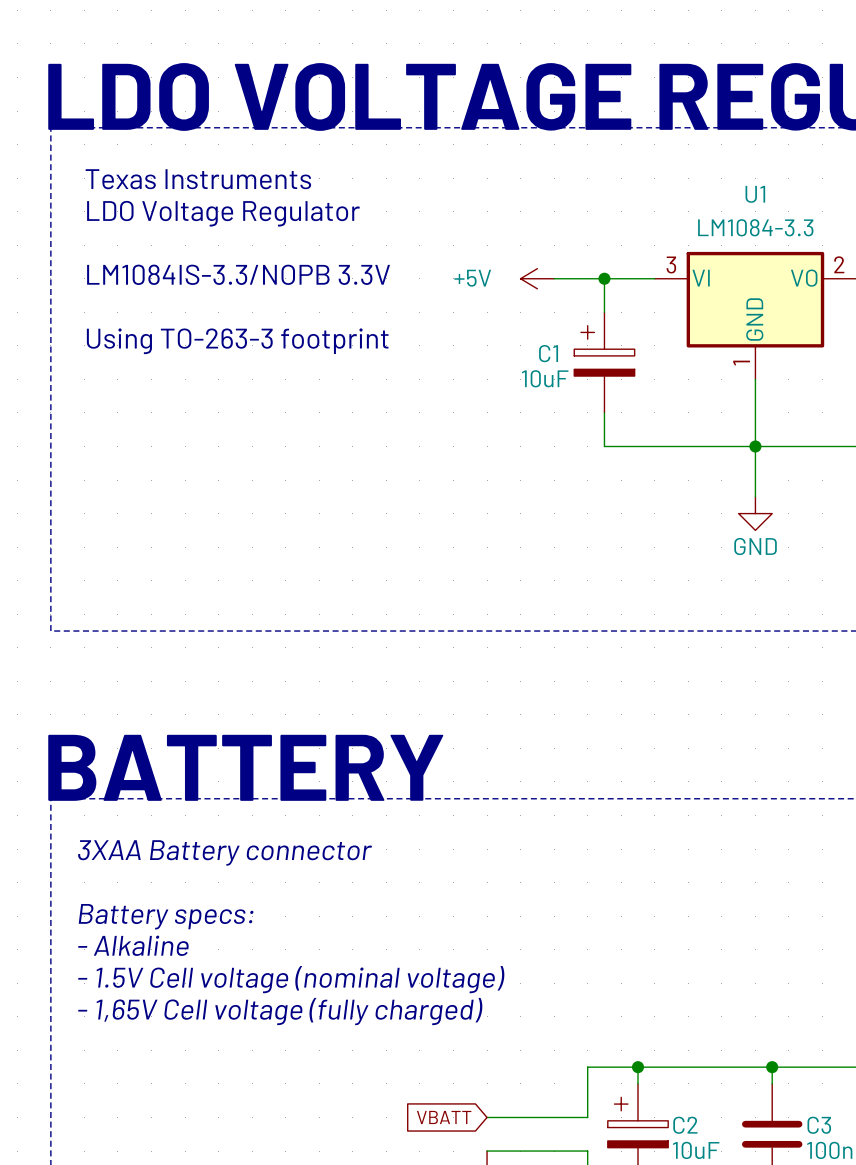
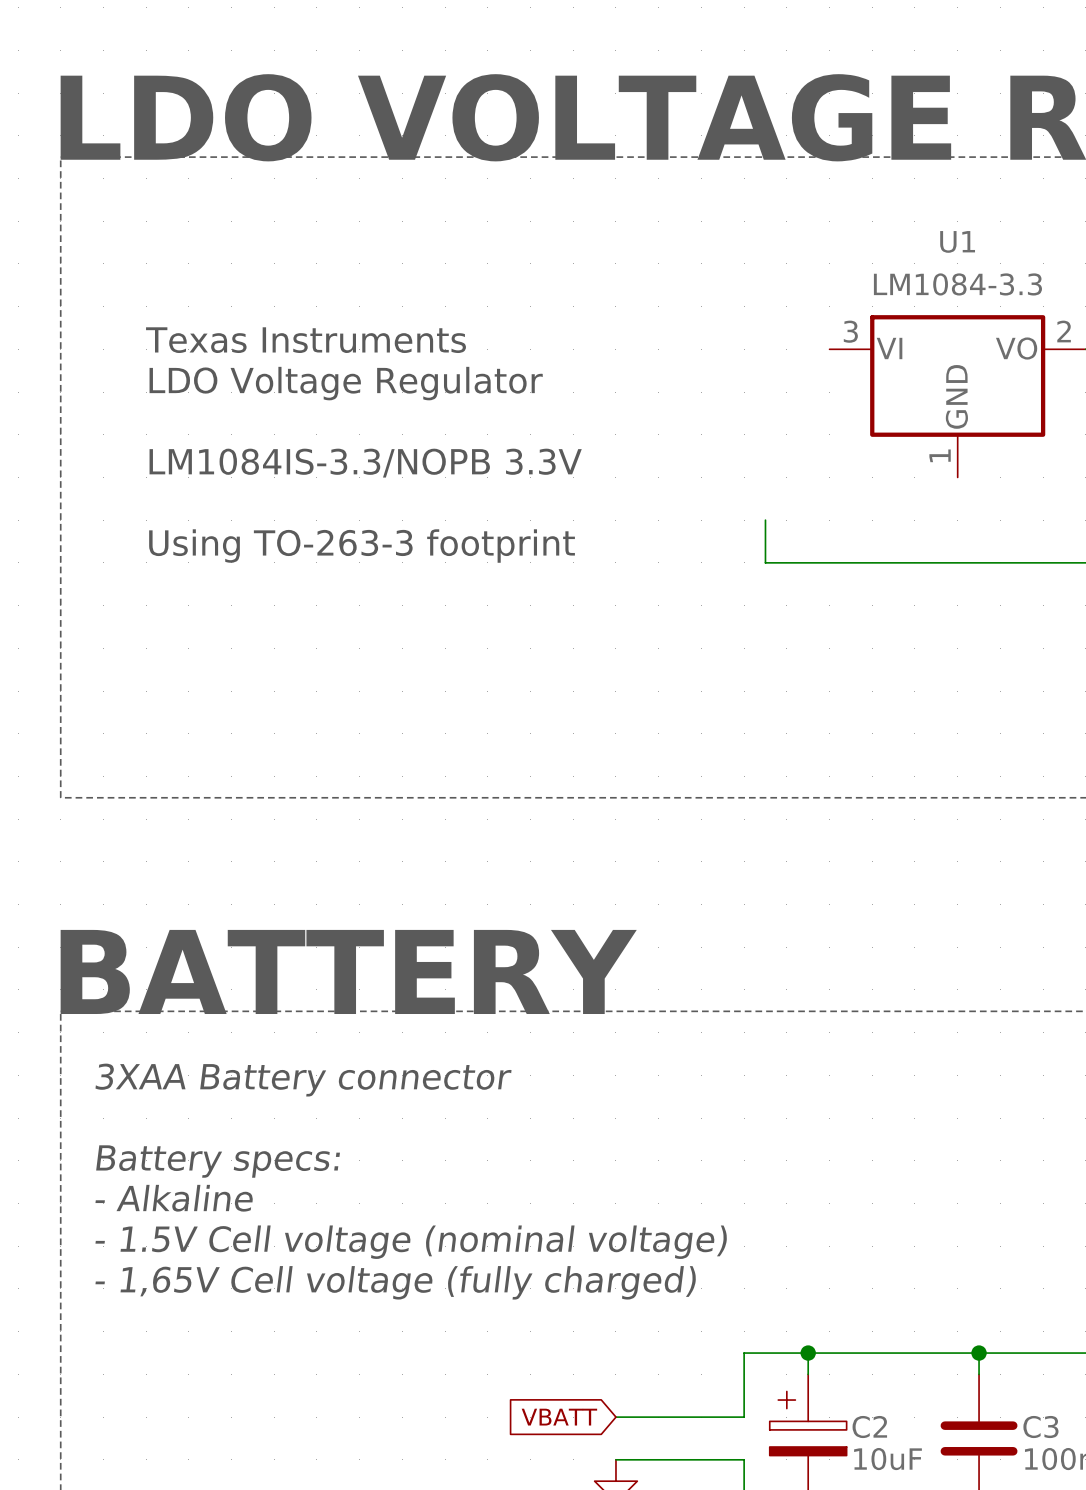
text position: Texas Instruments (198, 179) -> Texas Instruments (306, 340)
text position: LDO Voltage Regulator (223, 213) -> LDO Voltage Regulator (346, 383)
text position: LM1084IS-3.3/NOPB 3.3V (238, 274) -> LM1084IS-3.3/NOPB 3.3V (365, 463)
power symbol: +5V (537, 278) -> none
wire: (554, 278) (654, 278) -> none
wire: (604, 278) (604, 312) -> none
junction: (604, 278) -> none
text position: Using TO-263-3 footprint (237, 341) -> Using TO-263-3 footprint (362, 546)
C1: 10uF (604, 362) -> none
wire: (755, 379) (755, 496) -> none
junction: (755, 446) -> none
power symbol: GND (755, 513) -> none

